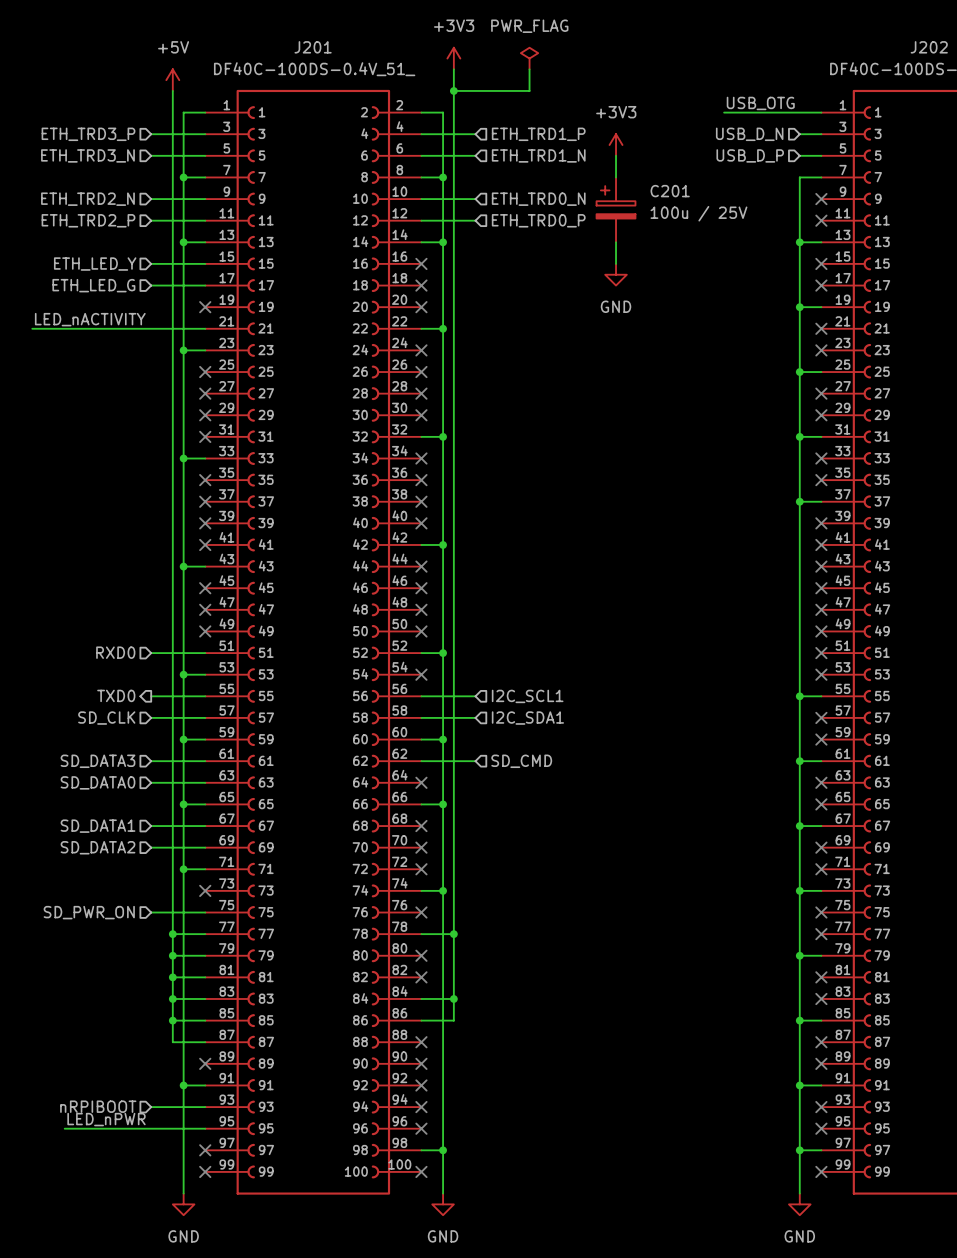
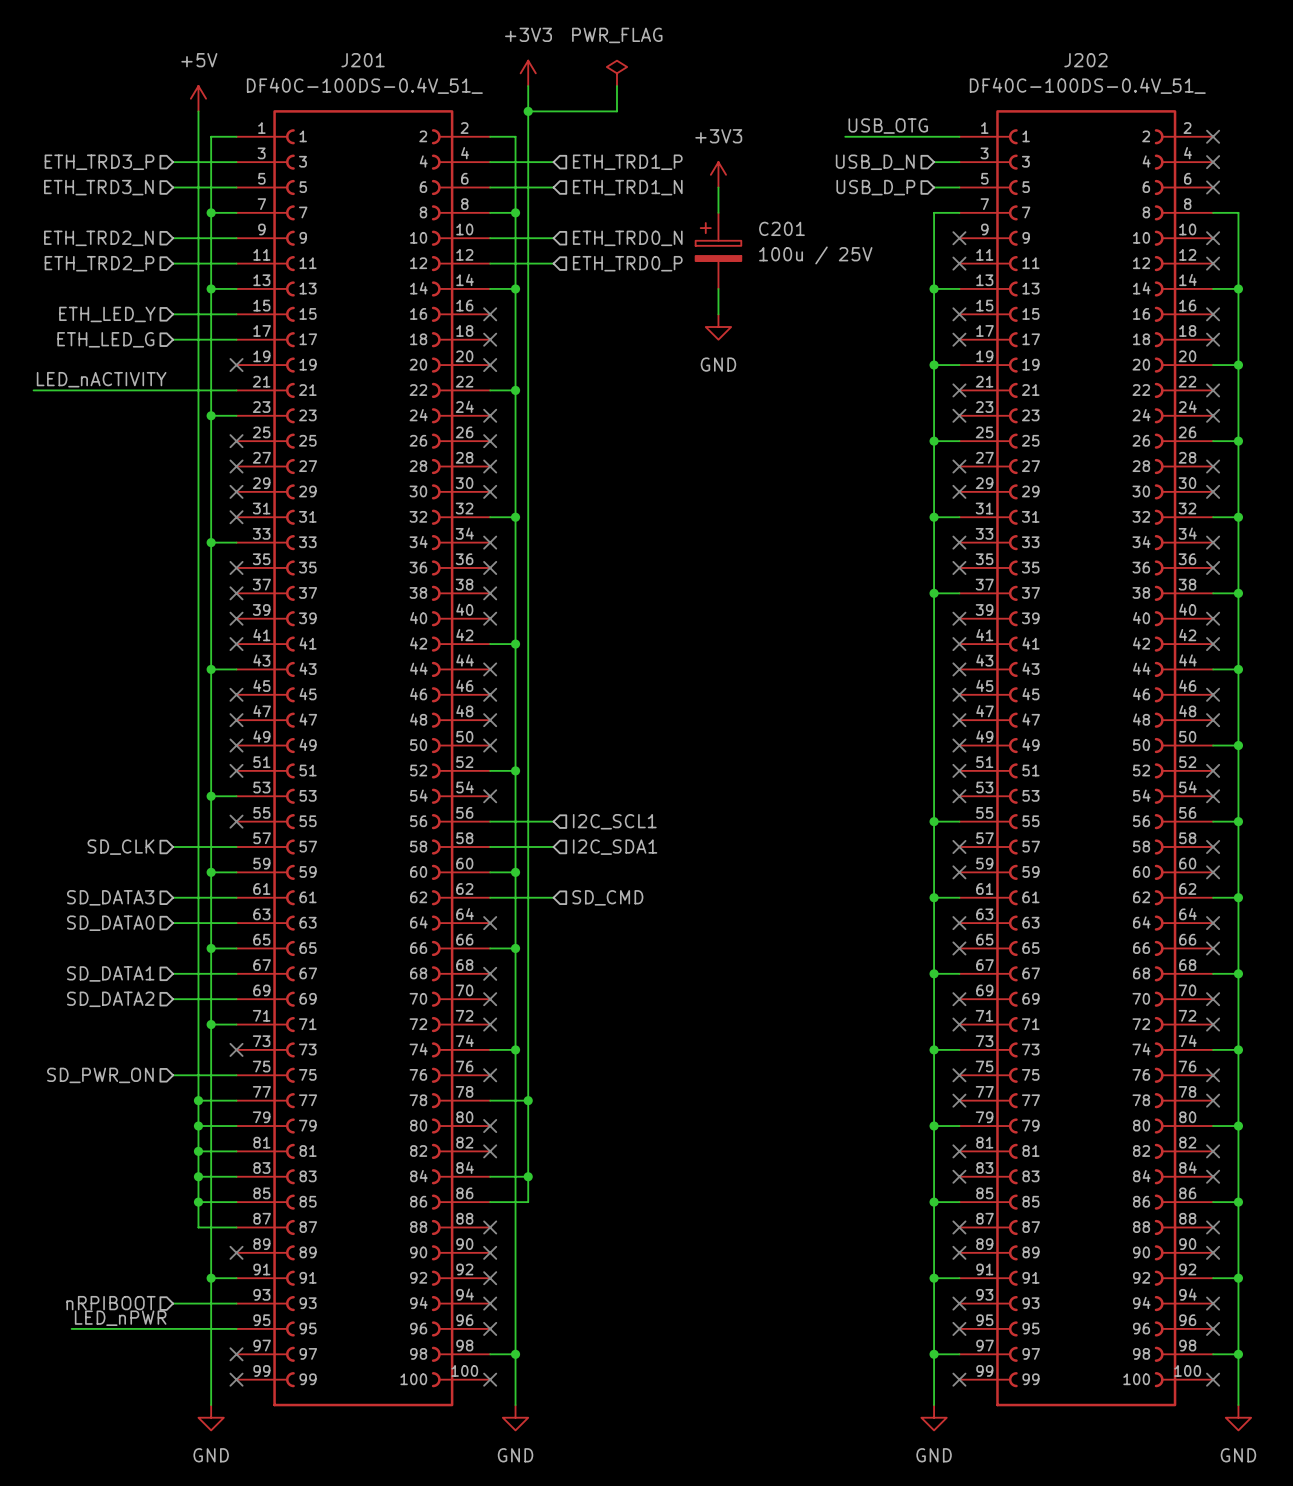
hierarchical label: RXD0 (115, 652) -> none
wire: (151, 653) (205, 653) -> none
no-connect mark: none -> (236, 770)
hierarchical label: TXD0 (116, 695) -> none
wire: (151, 696) (205, 696) -> none
no-connect mark: none -> (236, 821)

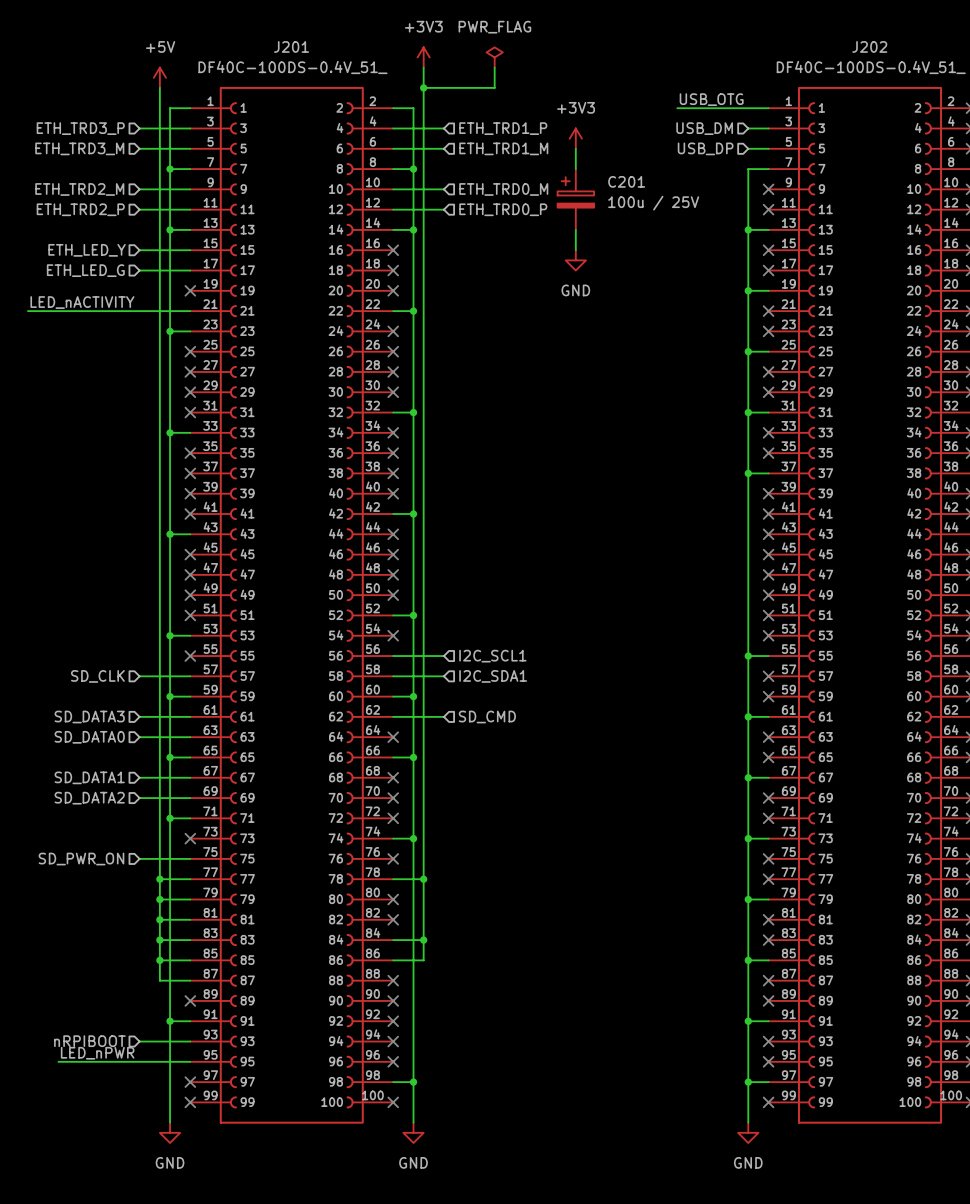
hierarchical label: USB_D_N (875, 162) -> USB_DM (704, 128)
hierarchical label: ETH_TRD3_N (98, 187) -> ETH_TRD3_M (79, 148)
hierarchical label: ETH_TRD1_N (627, 187) -> ETH_TRD1_M (503, 148)
hierarchical label: USB_D_P (875, 187) -> USB_DP (705, 148)
hierarchical label: ETH_TRD2_N (98, 238) -> ETH_TRD2_M (79, 189)
hierarchical label: ETH_TRD0_N (627, 238) -> ETH_TRD0_M (503, 189)

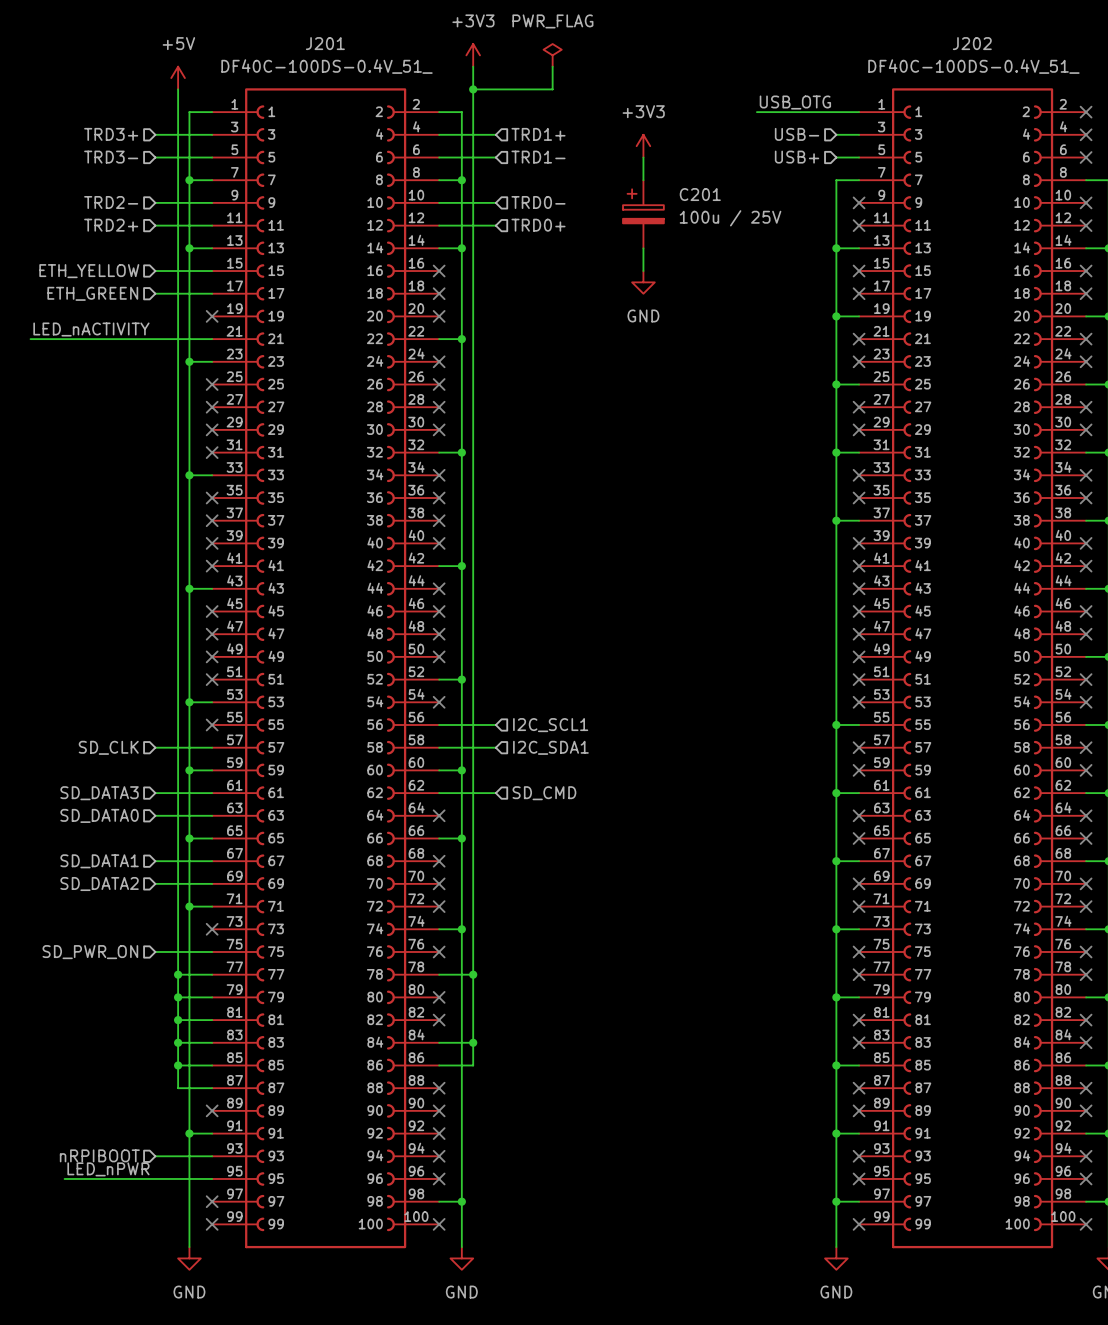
hierarchical label: ETH_TRD3_P (80, 128) -> TRD3+ (111, 134)
hierarchical label: ETH_TRD1_P (503, 128) -> TRD1+ (538, 134)
hierarchical label: USB_DM (704, 128) -> USB- (797, 134)
hierarchical label: ETH_TRD3_M (79, 148) -> TRD3- (111, 157)
hierarchical label: ETH_TRD1_M (503, 148) -> TRD1- (538, 157)
hierarchical label: USB_DP (705, 148) -> USB+ (797, 157)
hierarchical label: ETH_TRD2_M (79, 189) -> TRD2- (111, 202)
hierarchical label: ETH_TRD0_M (503, 189) -> TRD0- (538, 202)
hierarchical label: ETH_TRD2_P (80, 209) -> TRD2+ (111, 225)
hierarchical label: ETH_TRD0_P (503, 209) -> TRD0+ (538, 225)
hierarchical label: ETH_LED_Y (87, 250) -> ETH_YELLOW (89, 271)
hierarchical label: ETH_LED_G (85, 270) -> ETH_GREEN (92, 293)

